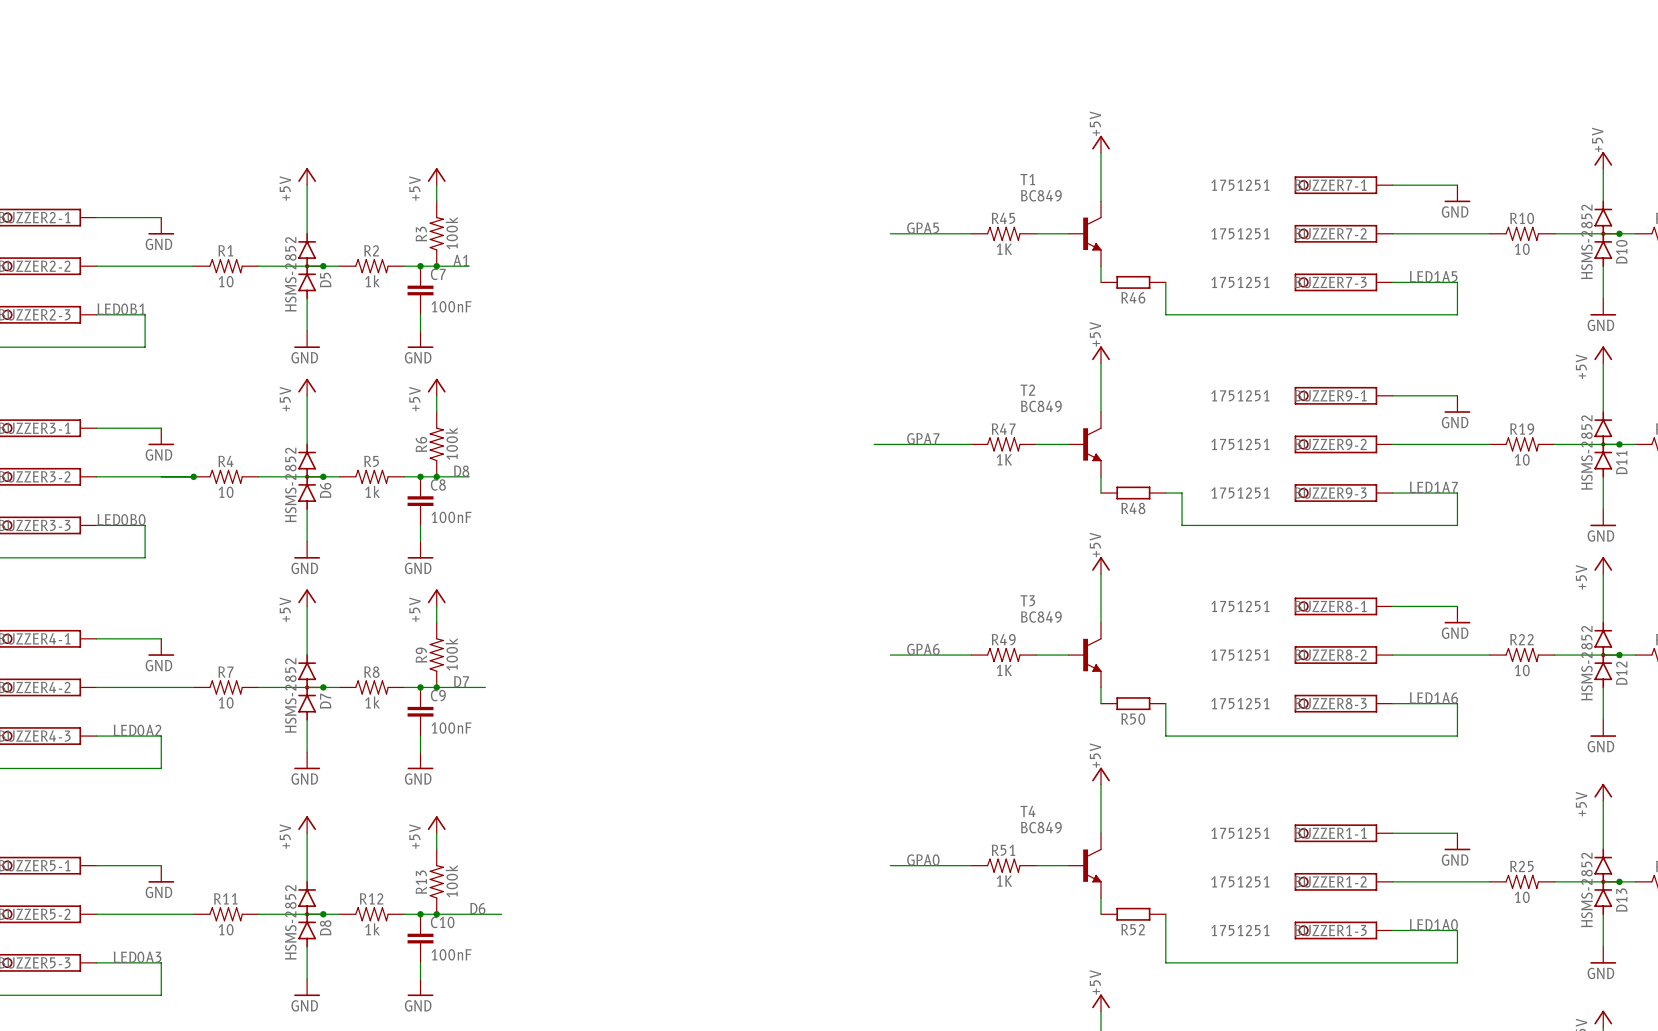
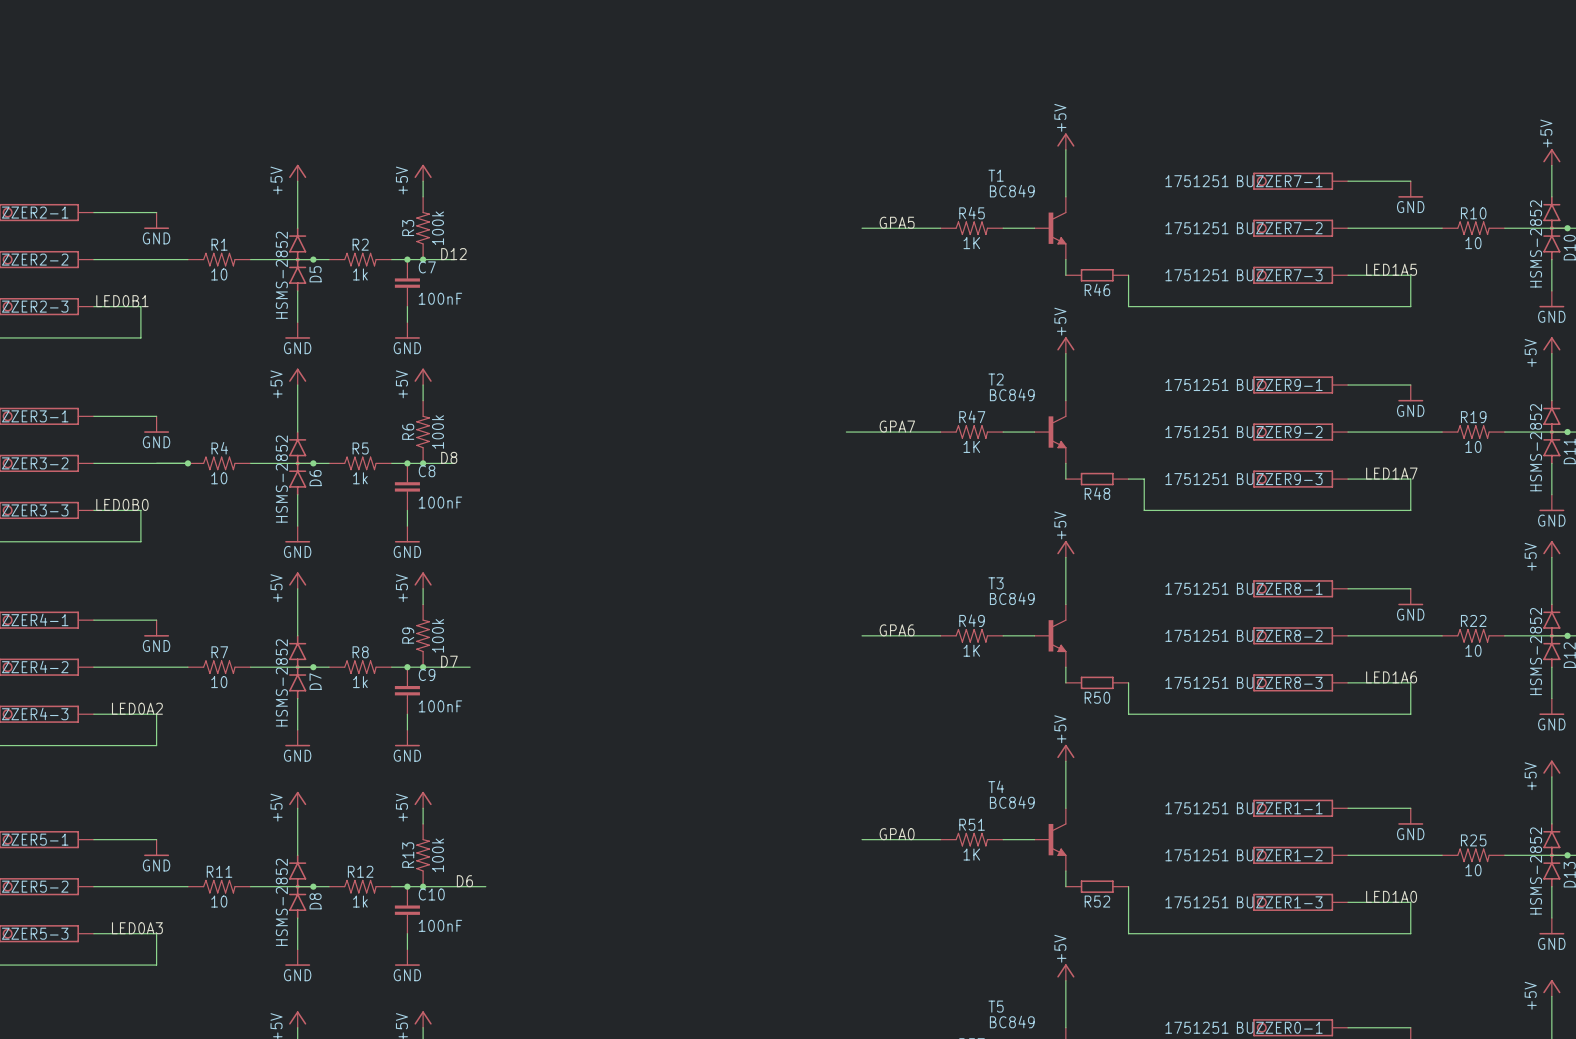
label: A1 (461, 260) -> D12 (453, 254)

